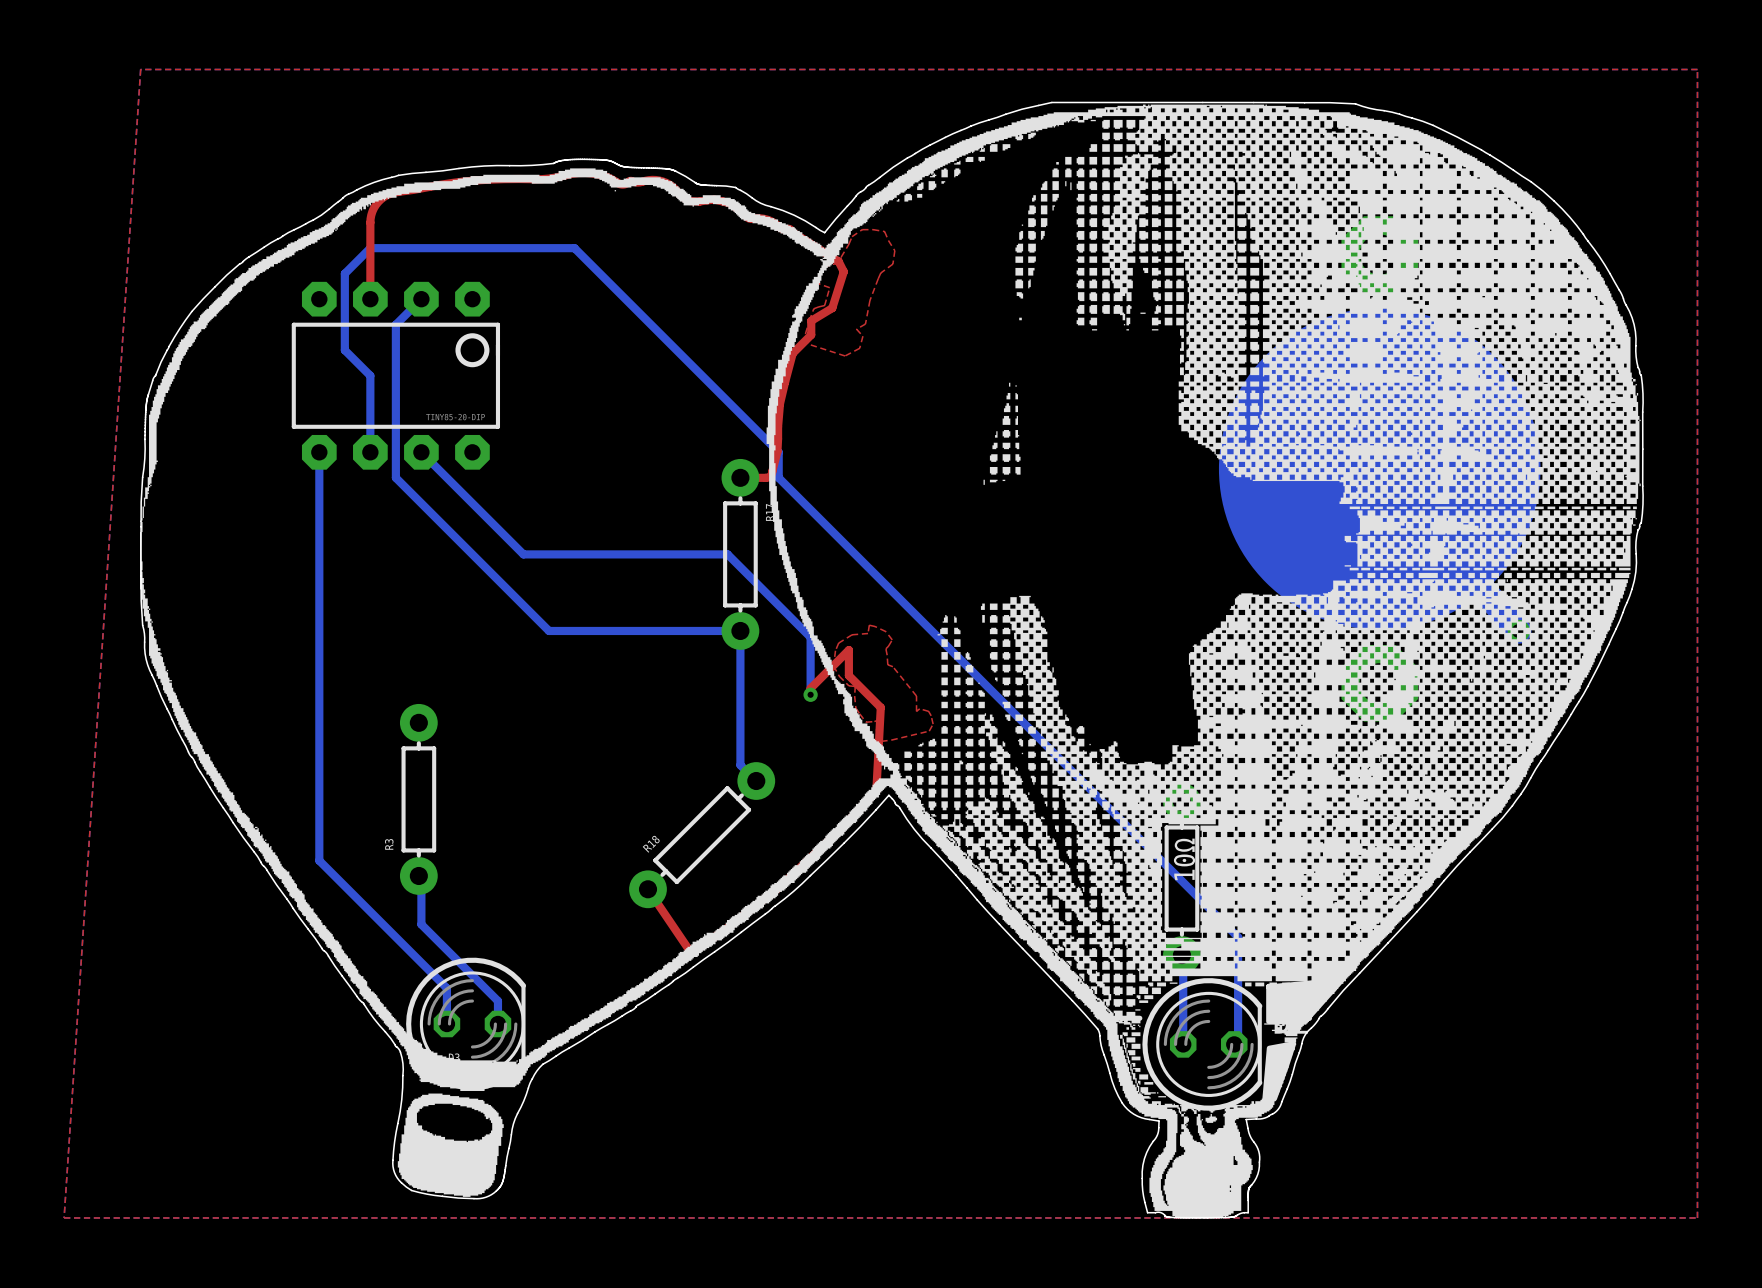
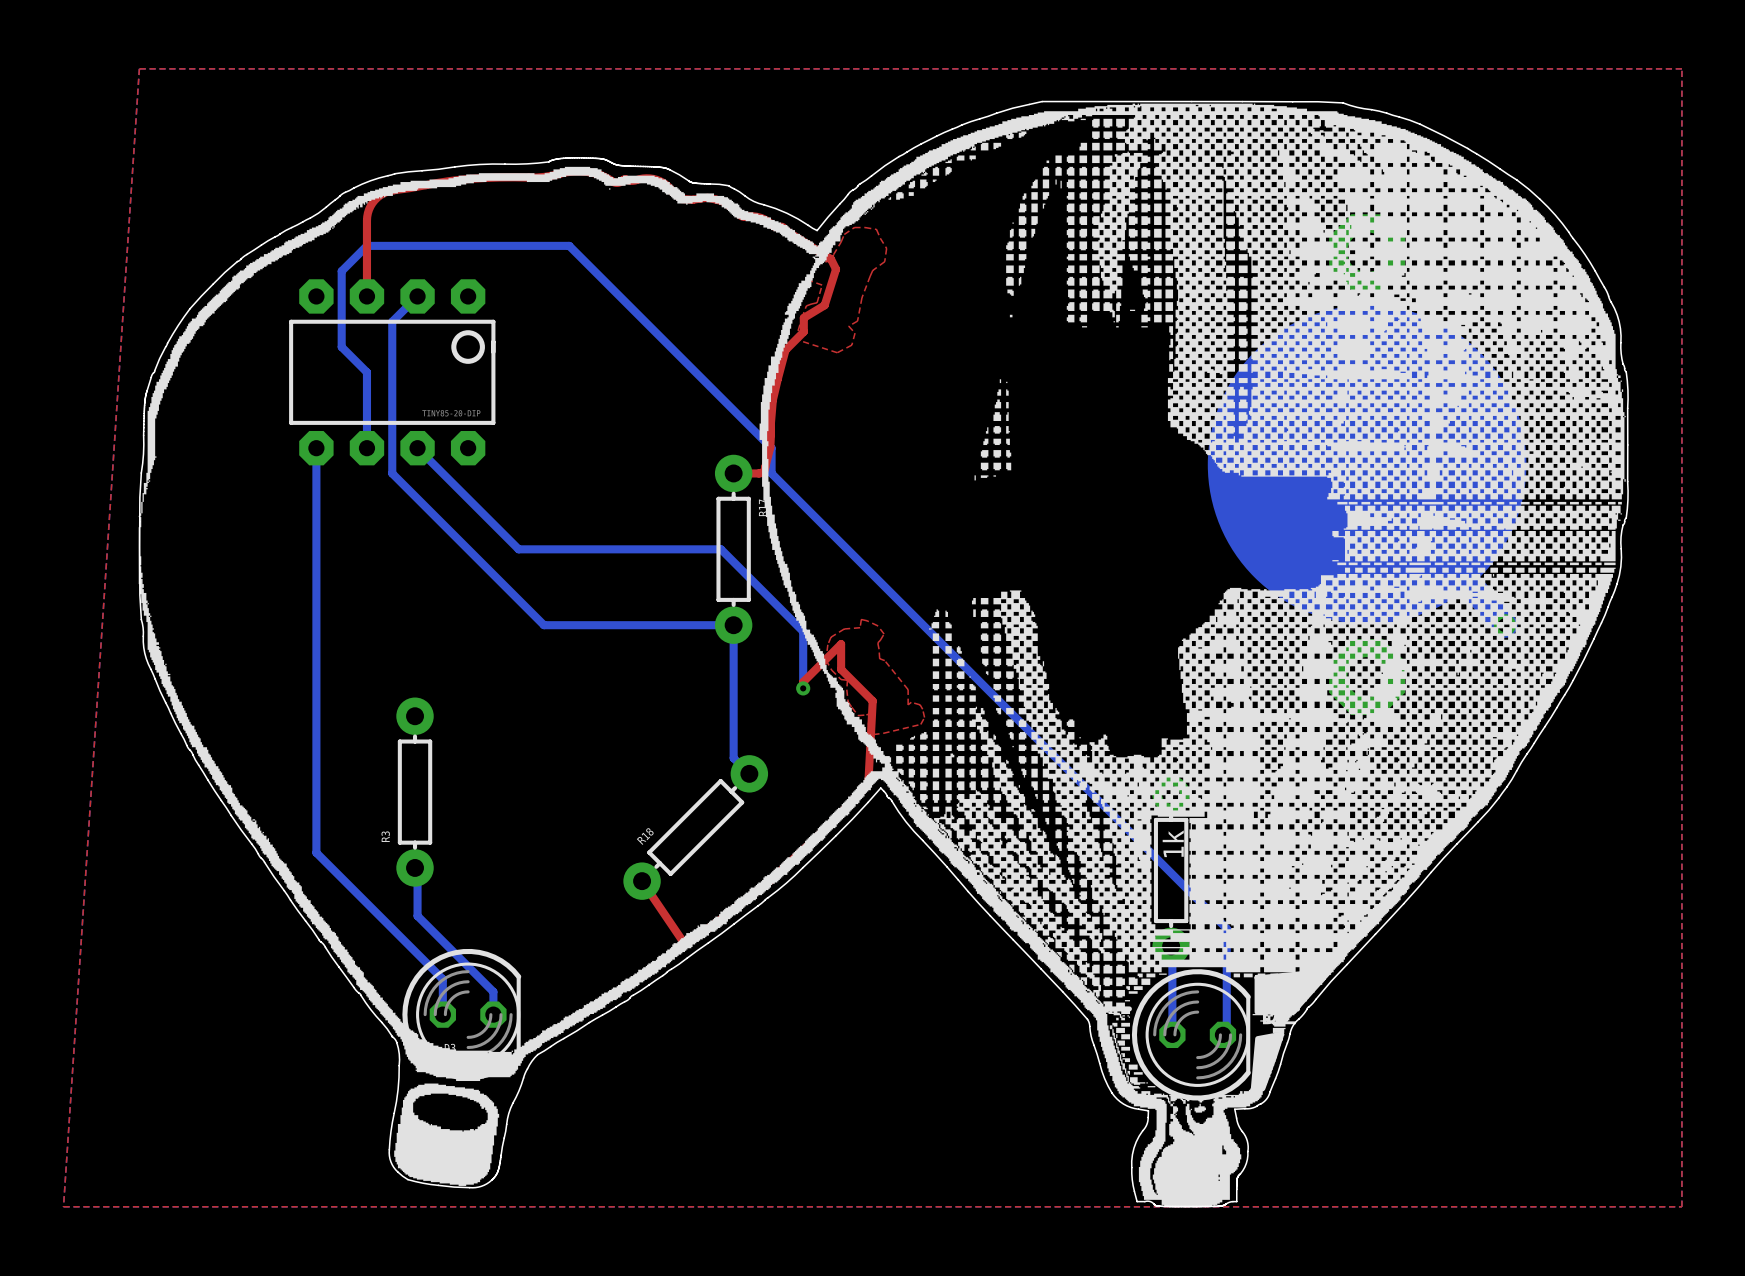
part value: 10Ω (1184, 859) -> 1k (1173, 843)

